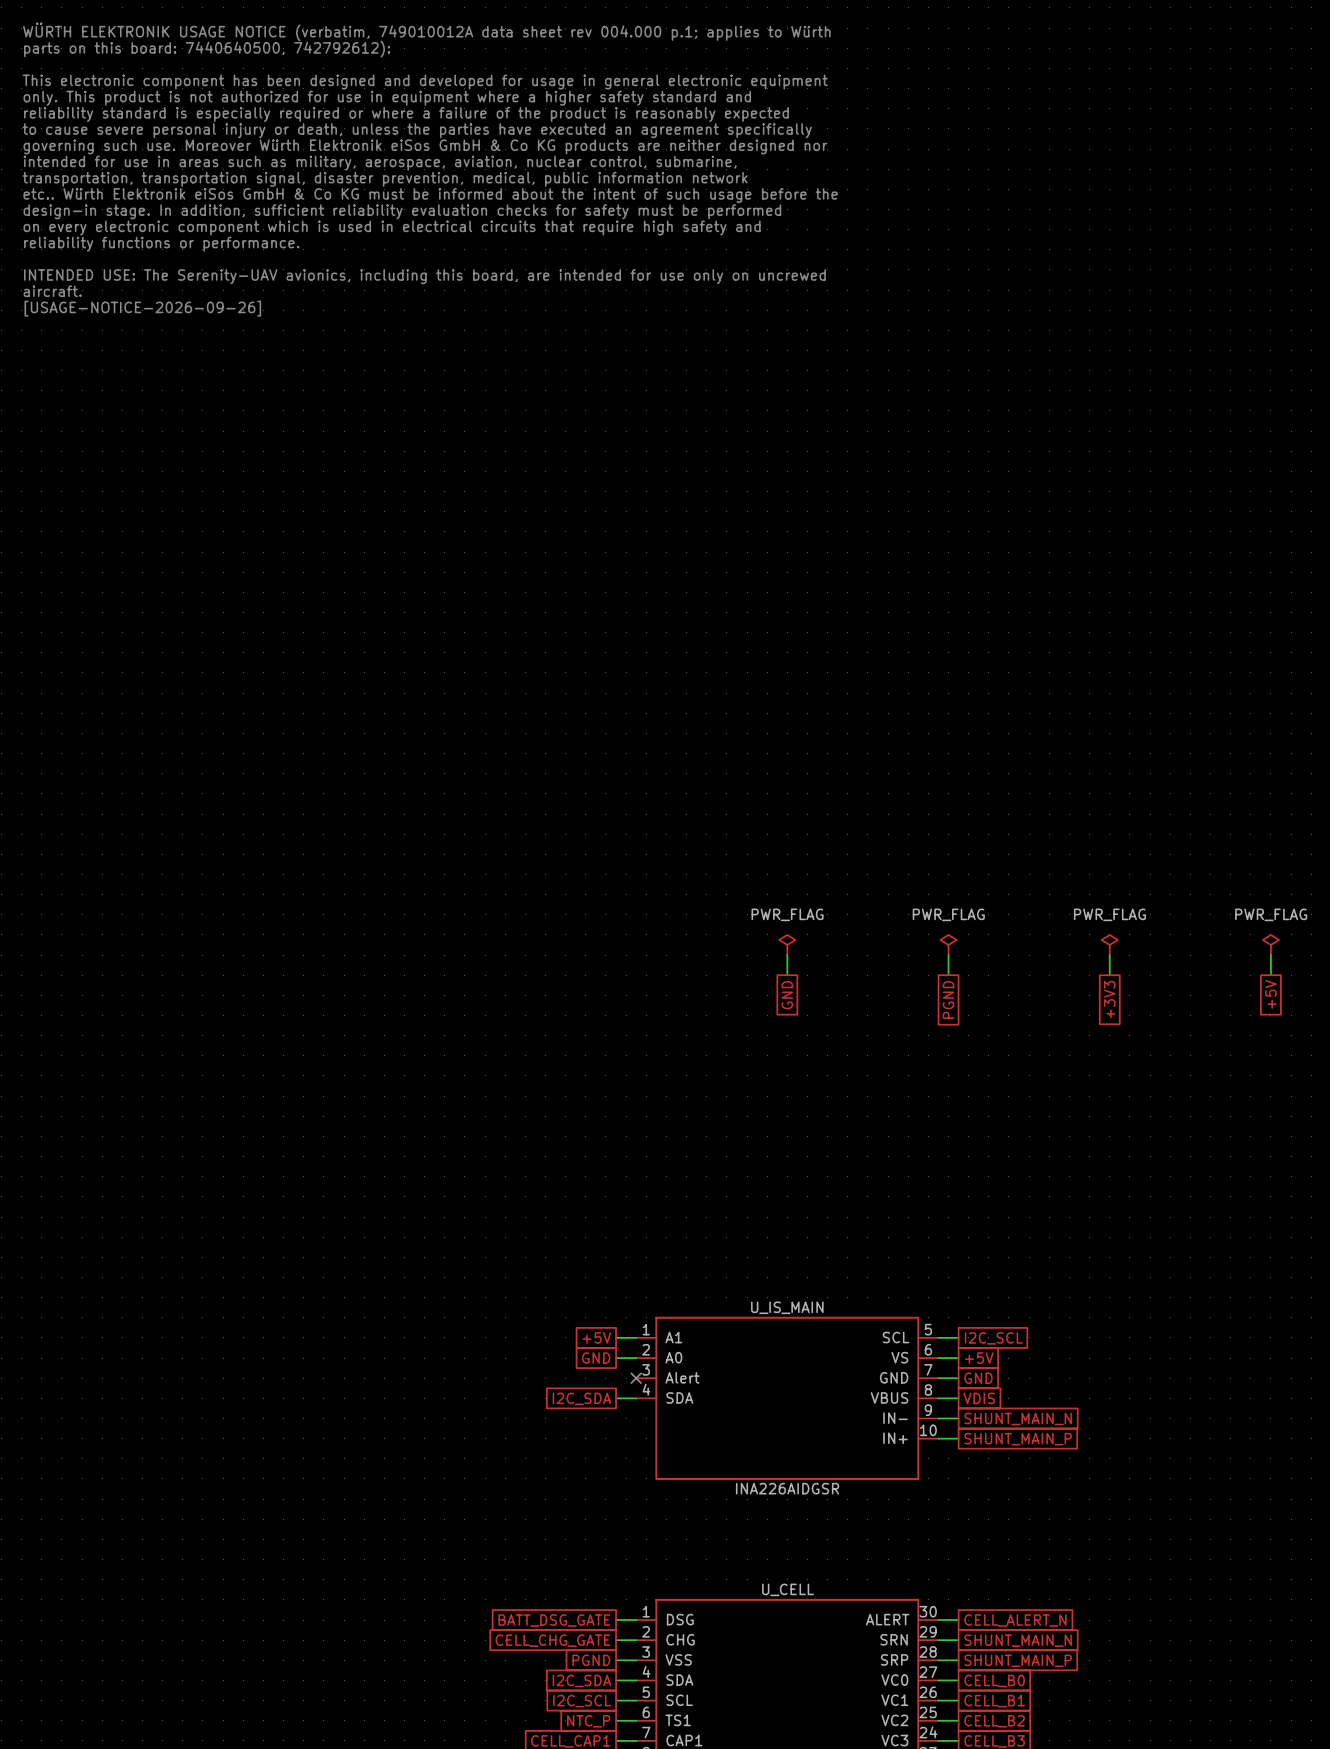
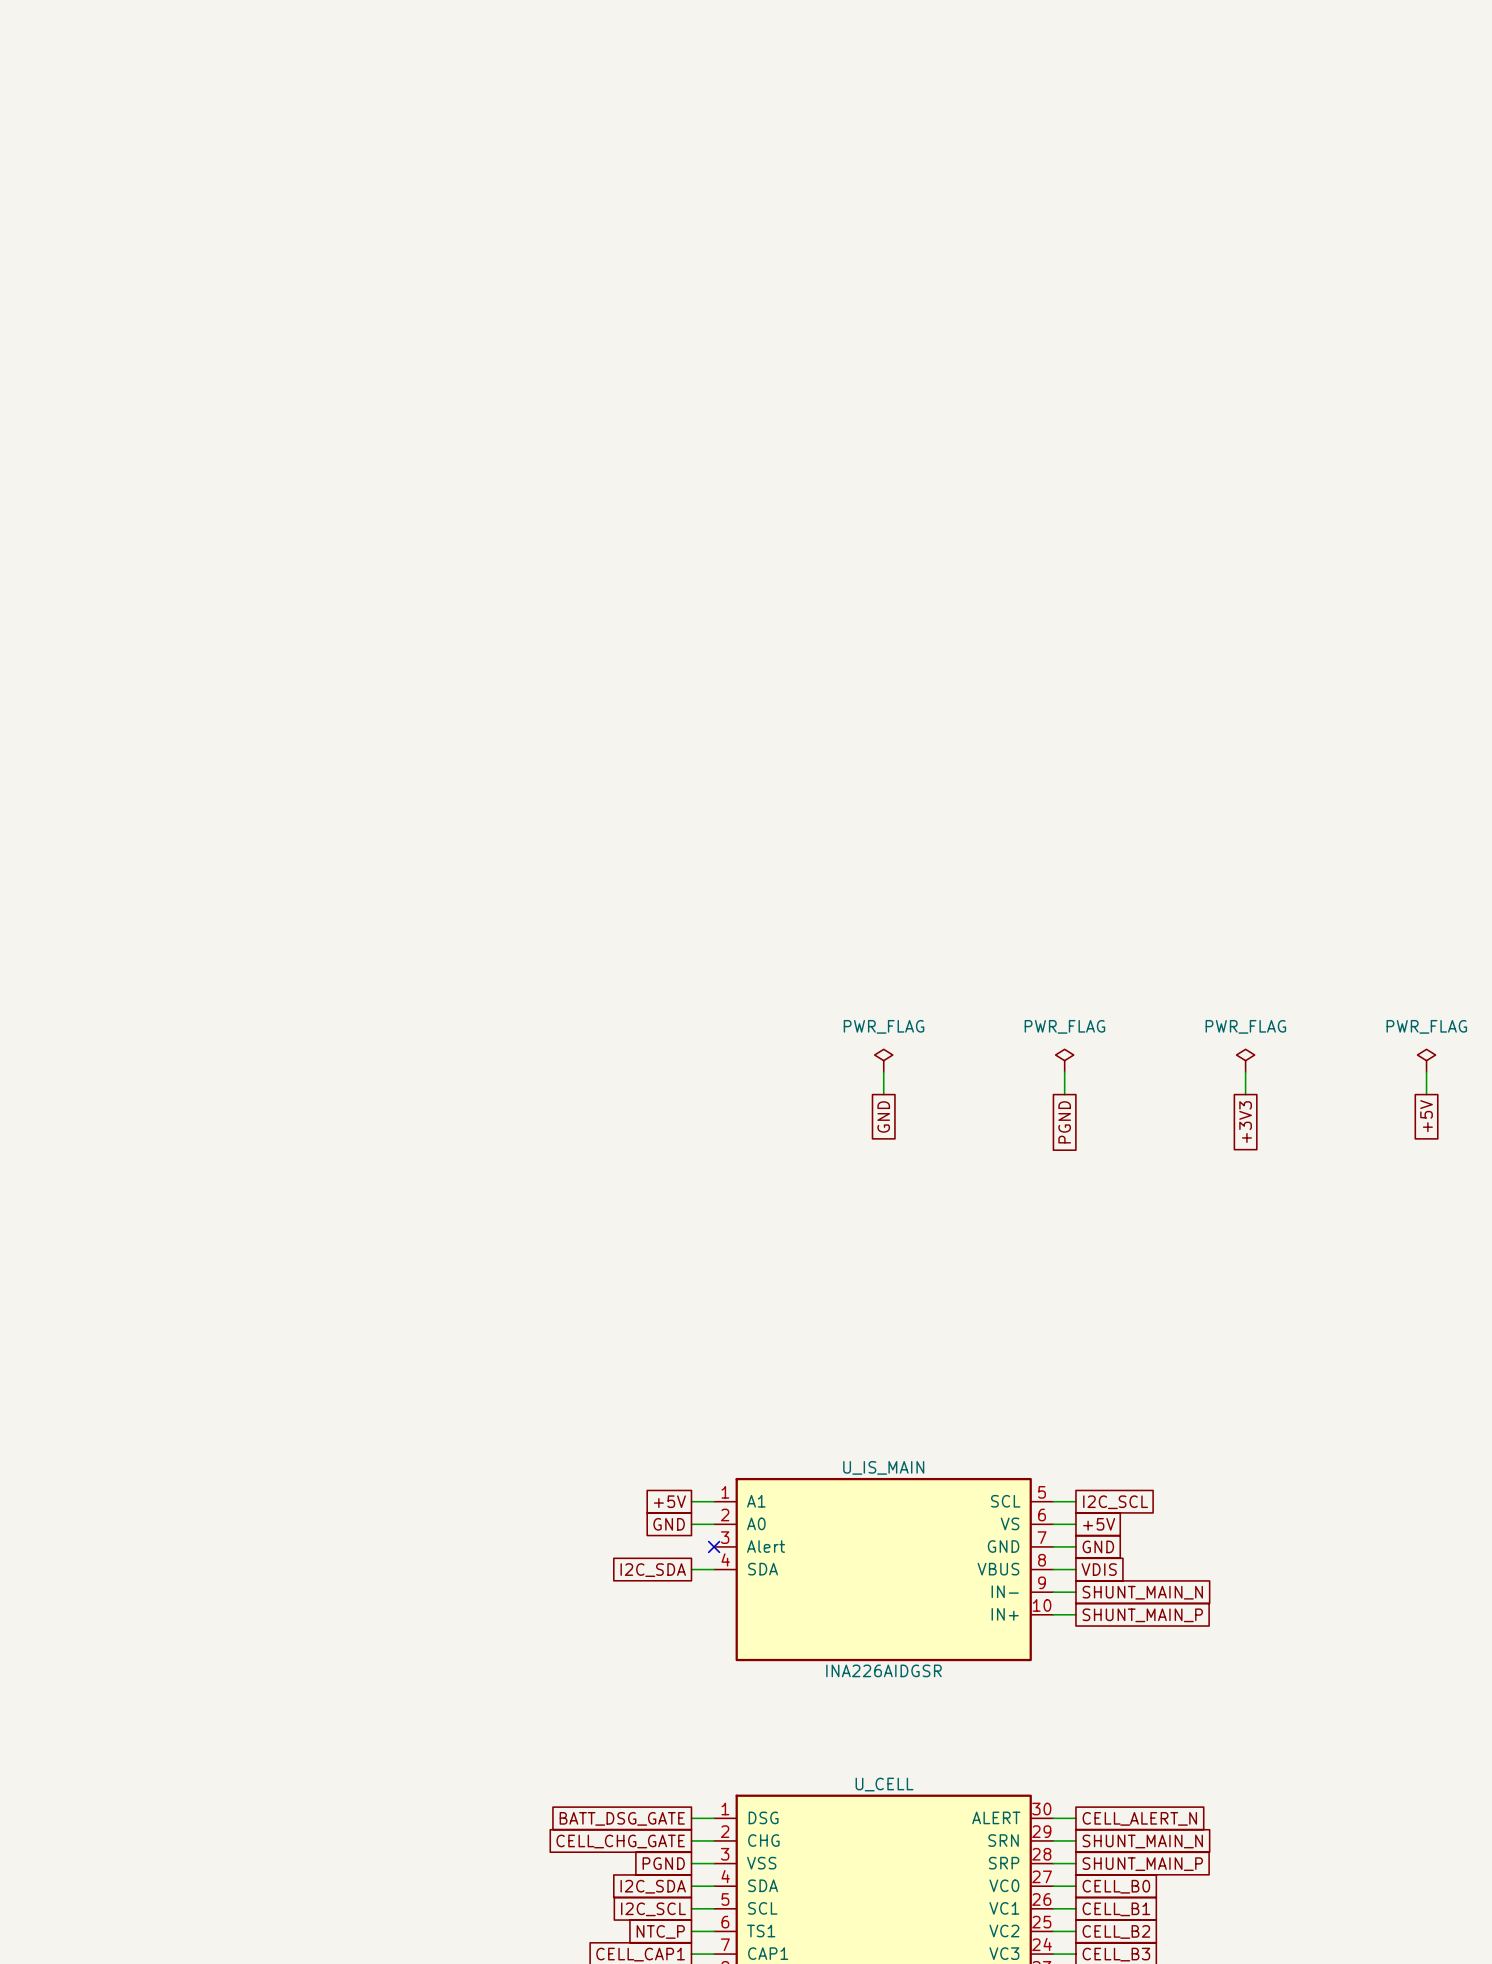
text: WÜRTH ELEKTRONIK USAGE NOTICE (verbatim, 749010012A data sheet rev 004.000 p.1; applies to Würth (426, 31) -> none
text: parts on this board: 7440640500, 742792612): (207, 49) -> none
text: This electronic component has been designed and developed for usage in general electronic equipment (425, 82) -> none
text: only. This product is not authorized for use in equipment where a higher safety standard and (387, 98) -> none
text: reliability standard is especially required or where a failure of the product is reasonably expected (406, 114) -> none
text: to cause severe personal injury or death, unless the parties have executed an agreement specifically (417, 130) -> none
text: governing such use. Moreover Würth Elektronik eiSos GmbH & Co KG products are neither designed nor (425, 146) -> none
text: intended for use in areas such as military, aerospace, aviation, nuclear control, submarine, (380, 163) -> none
text: transportation, transportation signal, disaster prevention, medical, public information network (385, 179) -> none
text: etc.. Würth Elektronik eiSos GmbH & Co KG must be informed about the intent of such usage before the (430, 195) -> none
text: design-in stage. In addition, sufficient reliability evaluation checks for safety must be performed (402, 211) -> none
text: on every electronic component which is used in electrical circuits that require high safety and (392, 228) -> none
text: reliability functions or performance. (161, 244) -> none
text: INTENDED USE: The Serenity-UAV avionics, including this board, are intended for use only on uncrewed (424, 276) -> none
text: aircraft. (52, 291) -> none
text: [USAGE-NOTICE-2026-09-26] (142, 308) -> none

